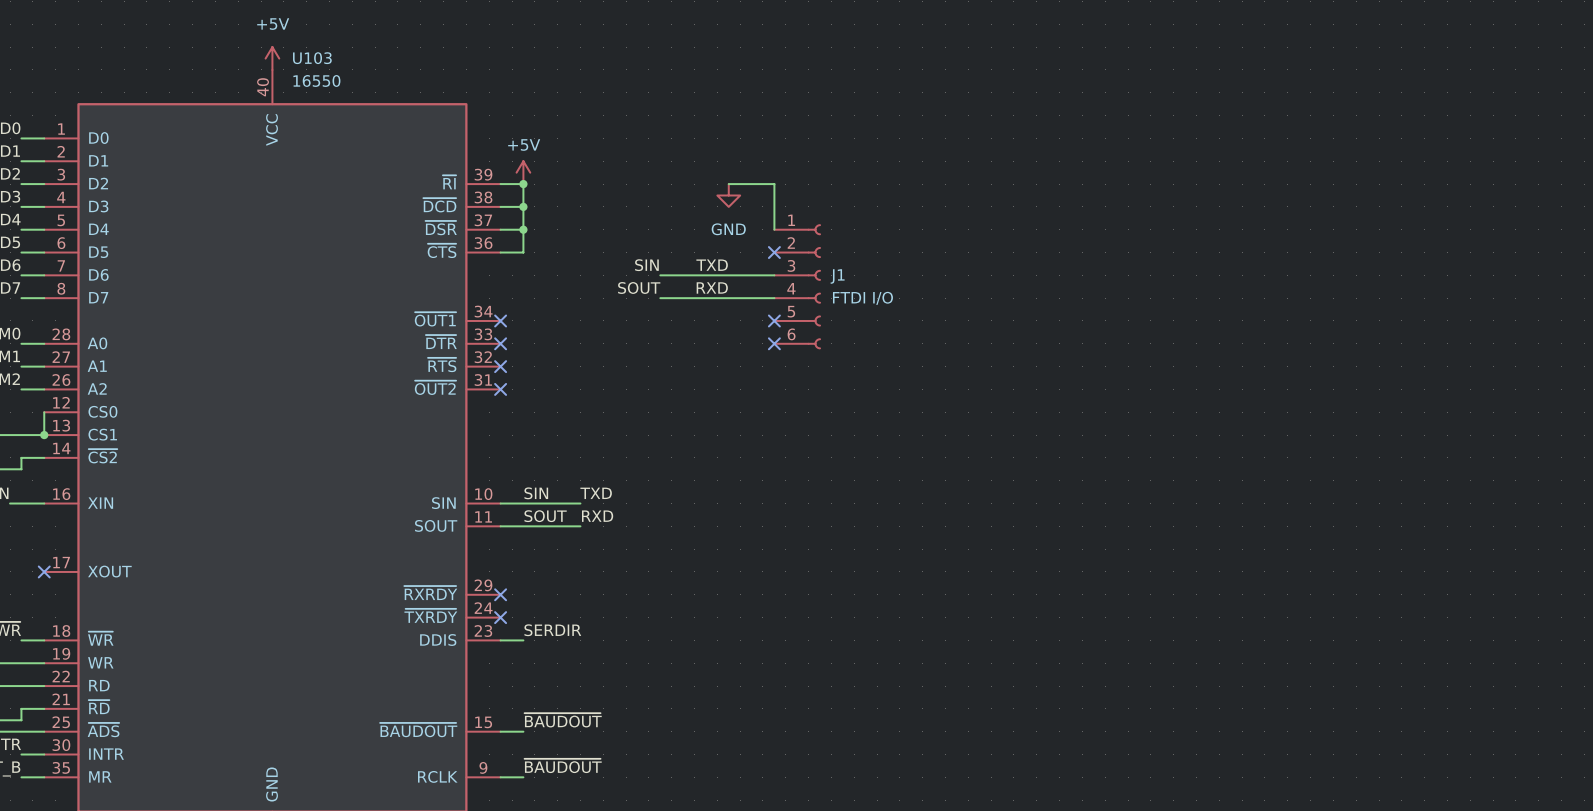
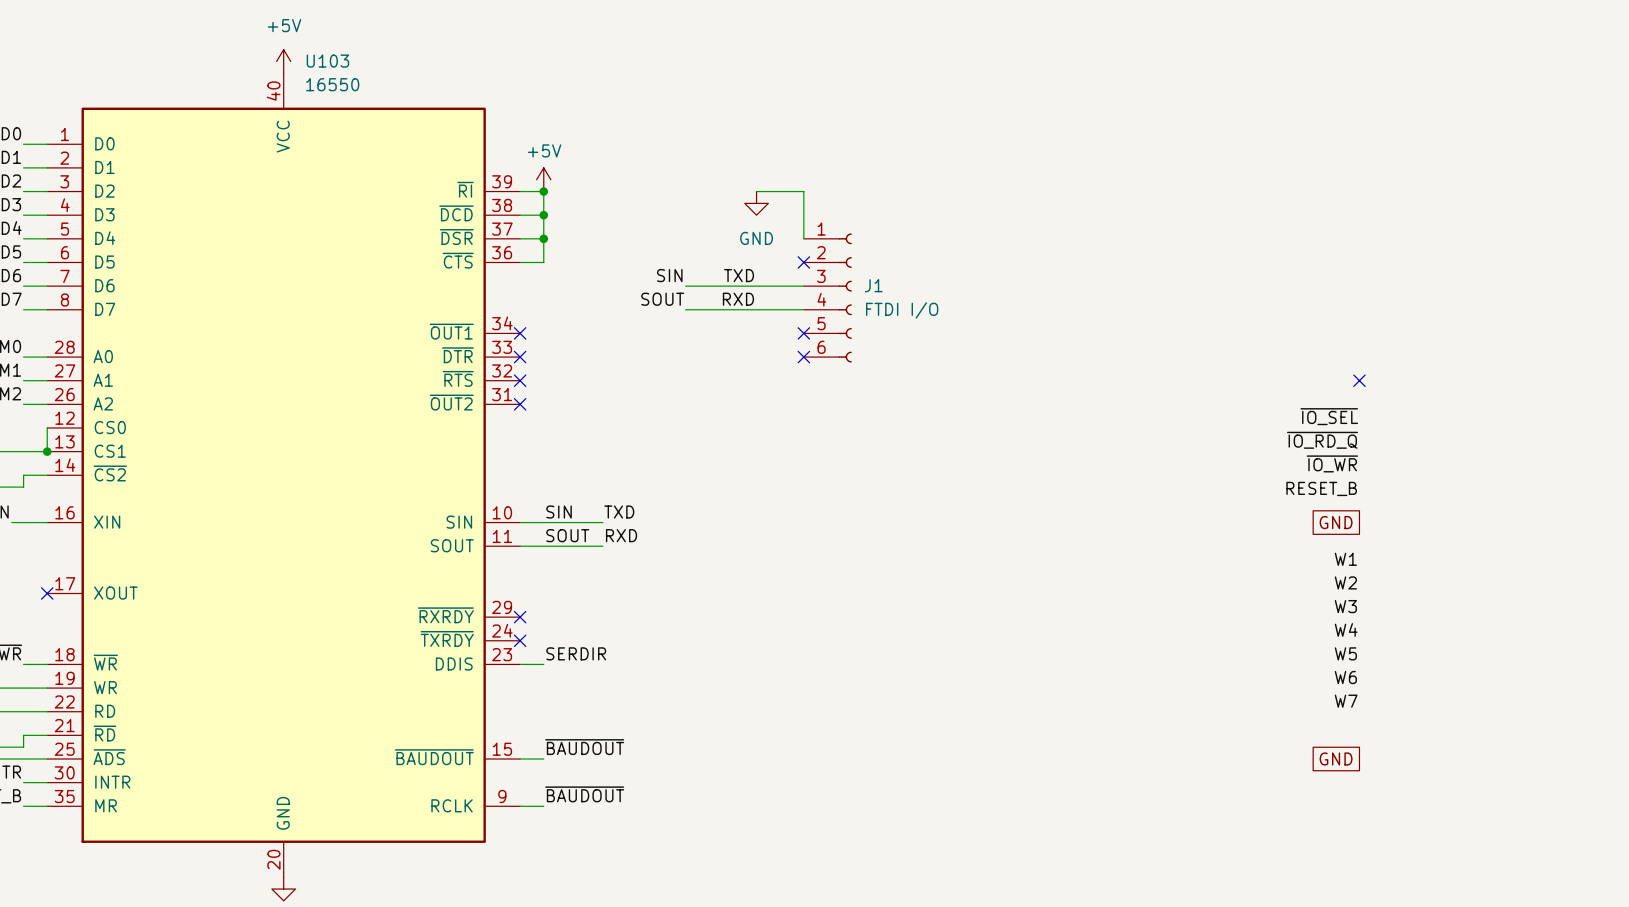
no-connect mark: none -> (1359, 380)
label: none -> ~{IO_SEL} (1329, 416)
label: none -> ~{IO_RD_Q} (1322, 440)
label: none -> ~{IO_WR} (1332, 463)
label: none -> RESET_B (1321, 488)
global label: none -> GND (1336, 522)
label: none -> W1 (1345, 559)
label: none -> W2 (1345, 582)
label: none -> W3 (1345, 606)
label: none -> W4 (1346, 629)
label: none -> W5 (1345, 653)
label: none -> W6 (1345, 677)
label: none -> W7 (1346, 701)
global label: none -> GND (1336, 758)

